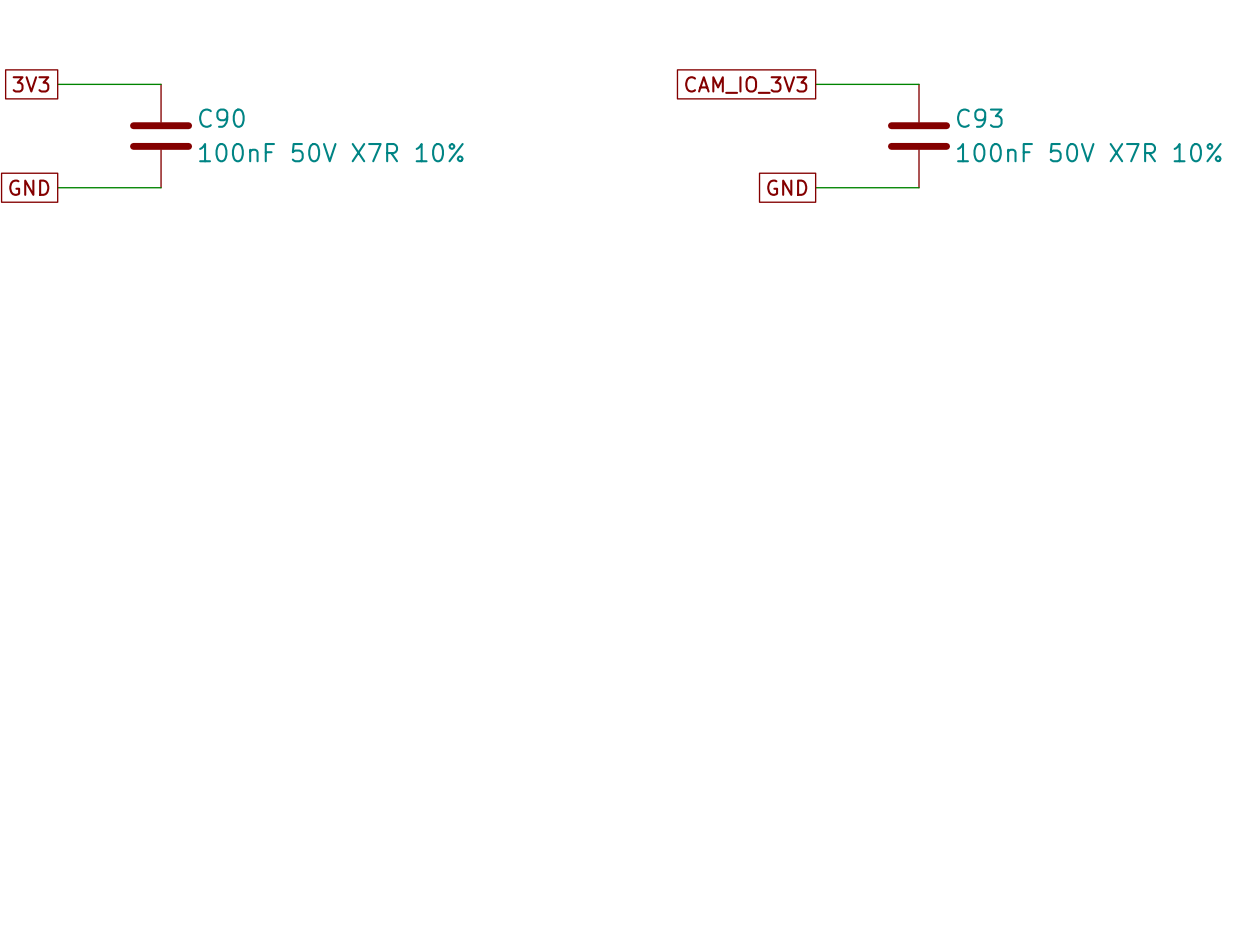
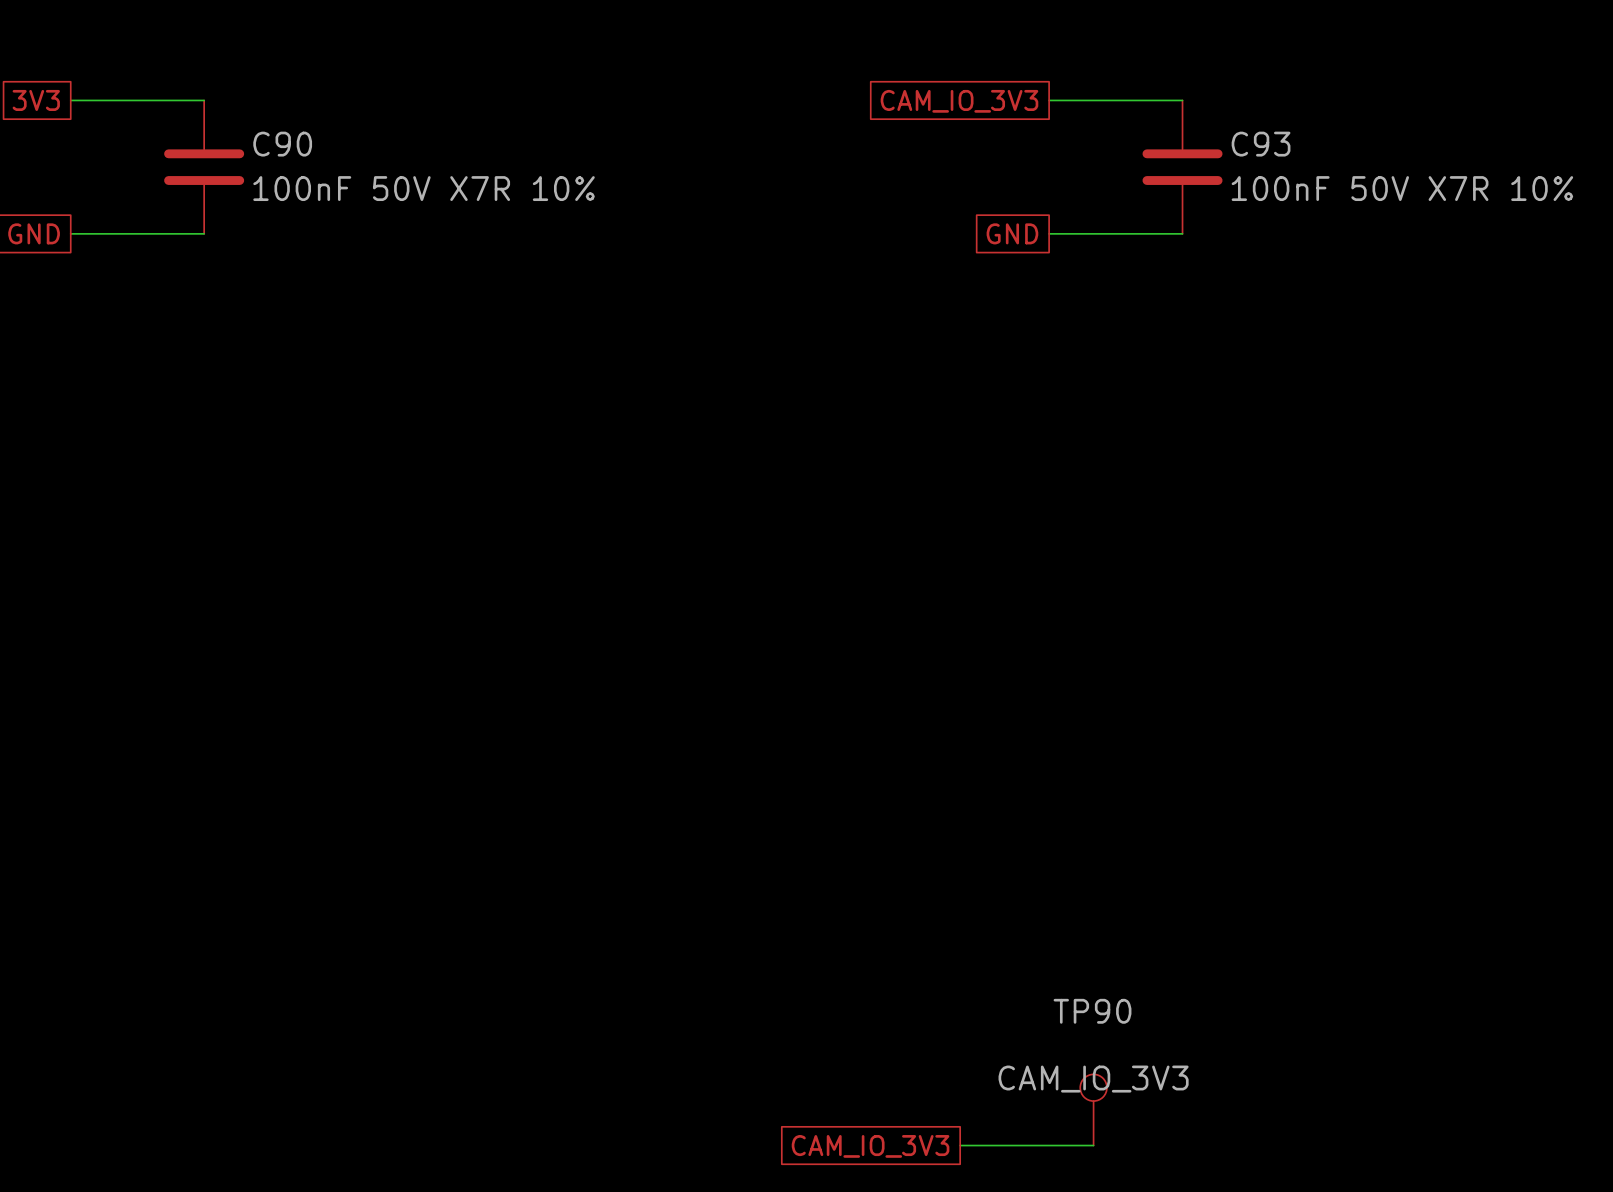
TP90: none -> CAM_IO_3V3 (1093, 1109)
global label: none -> CAM_IO_3V3 (870, 1146)
wire: none -> (960, 1145) (1093, 1145)

